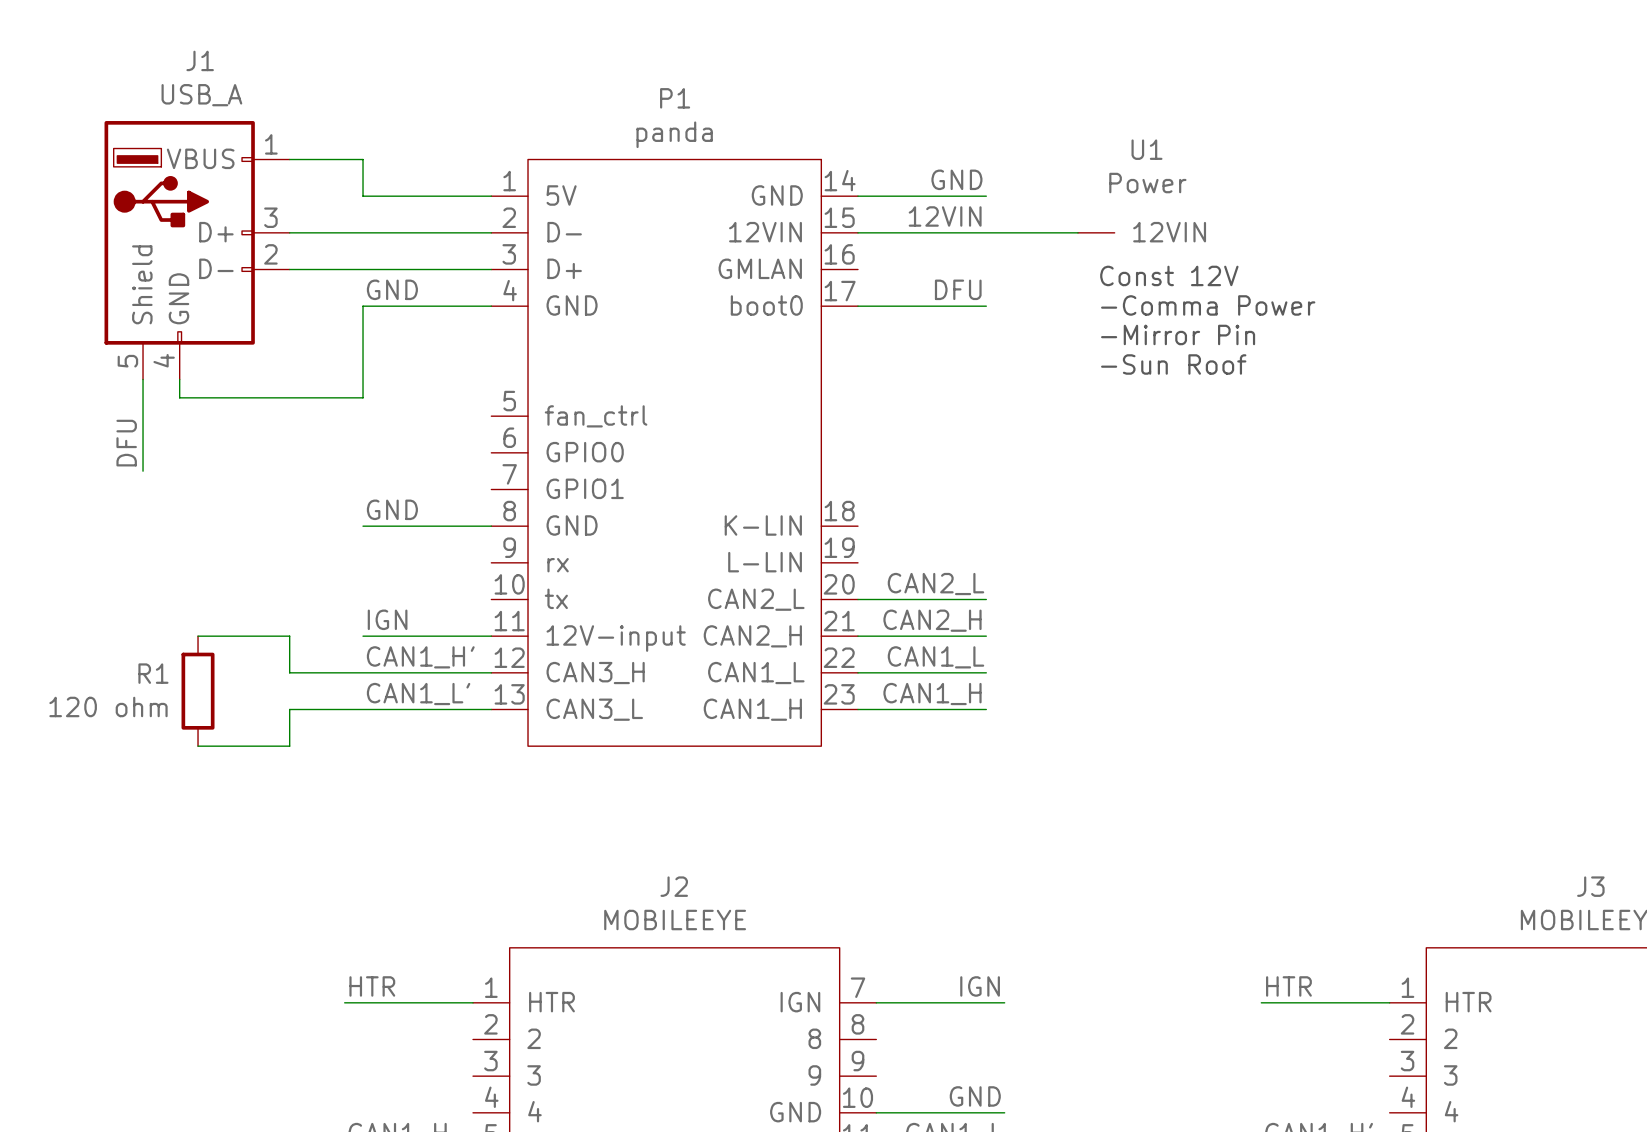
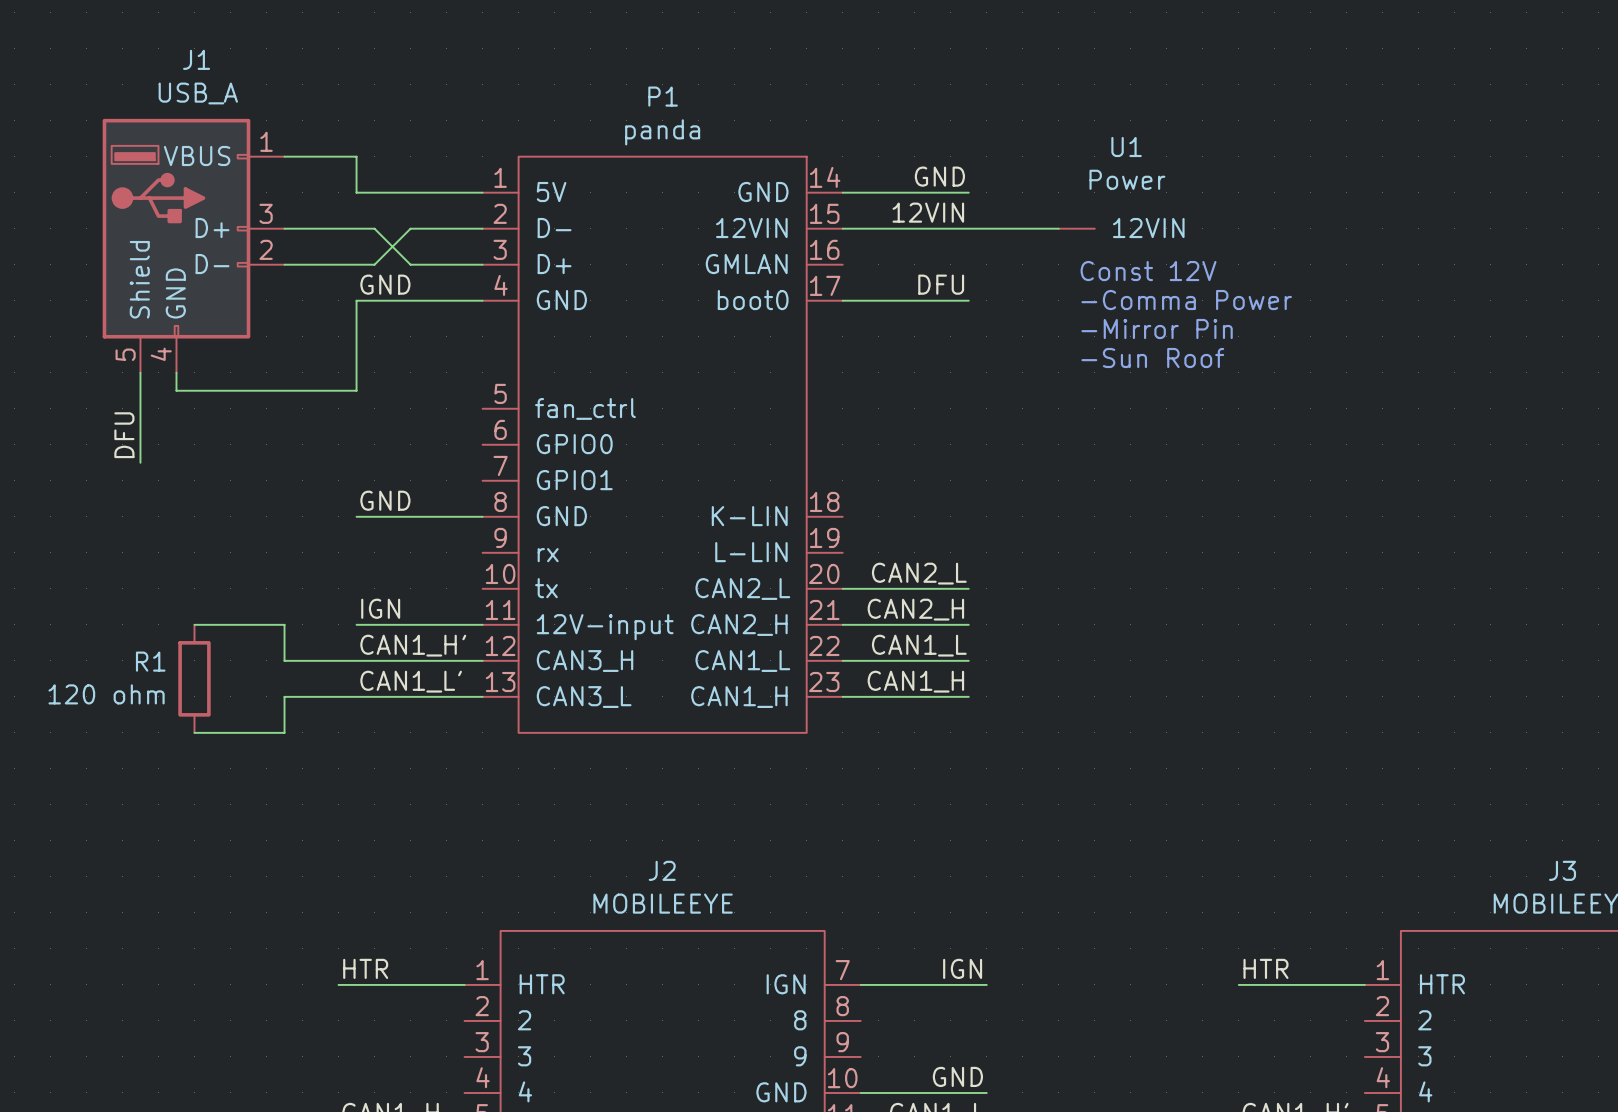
wire: (381, 232) (418, 232) -> (374, 228) (410, 264)
wire: (381, 269) (418, 269) -> (374, 264) (410, 228)

